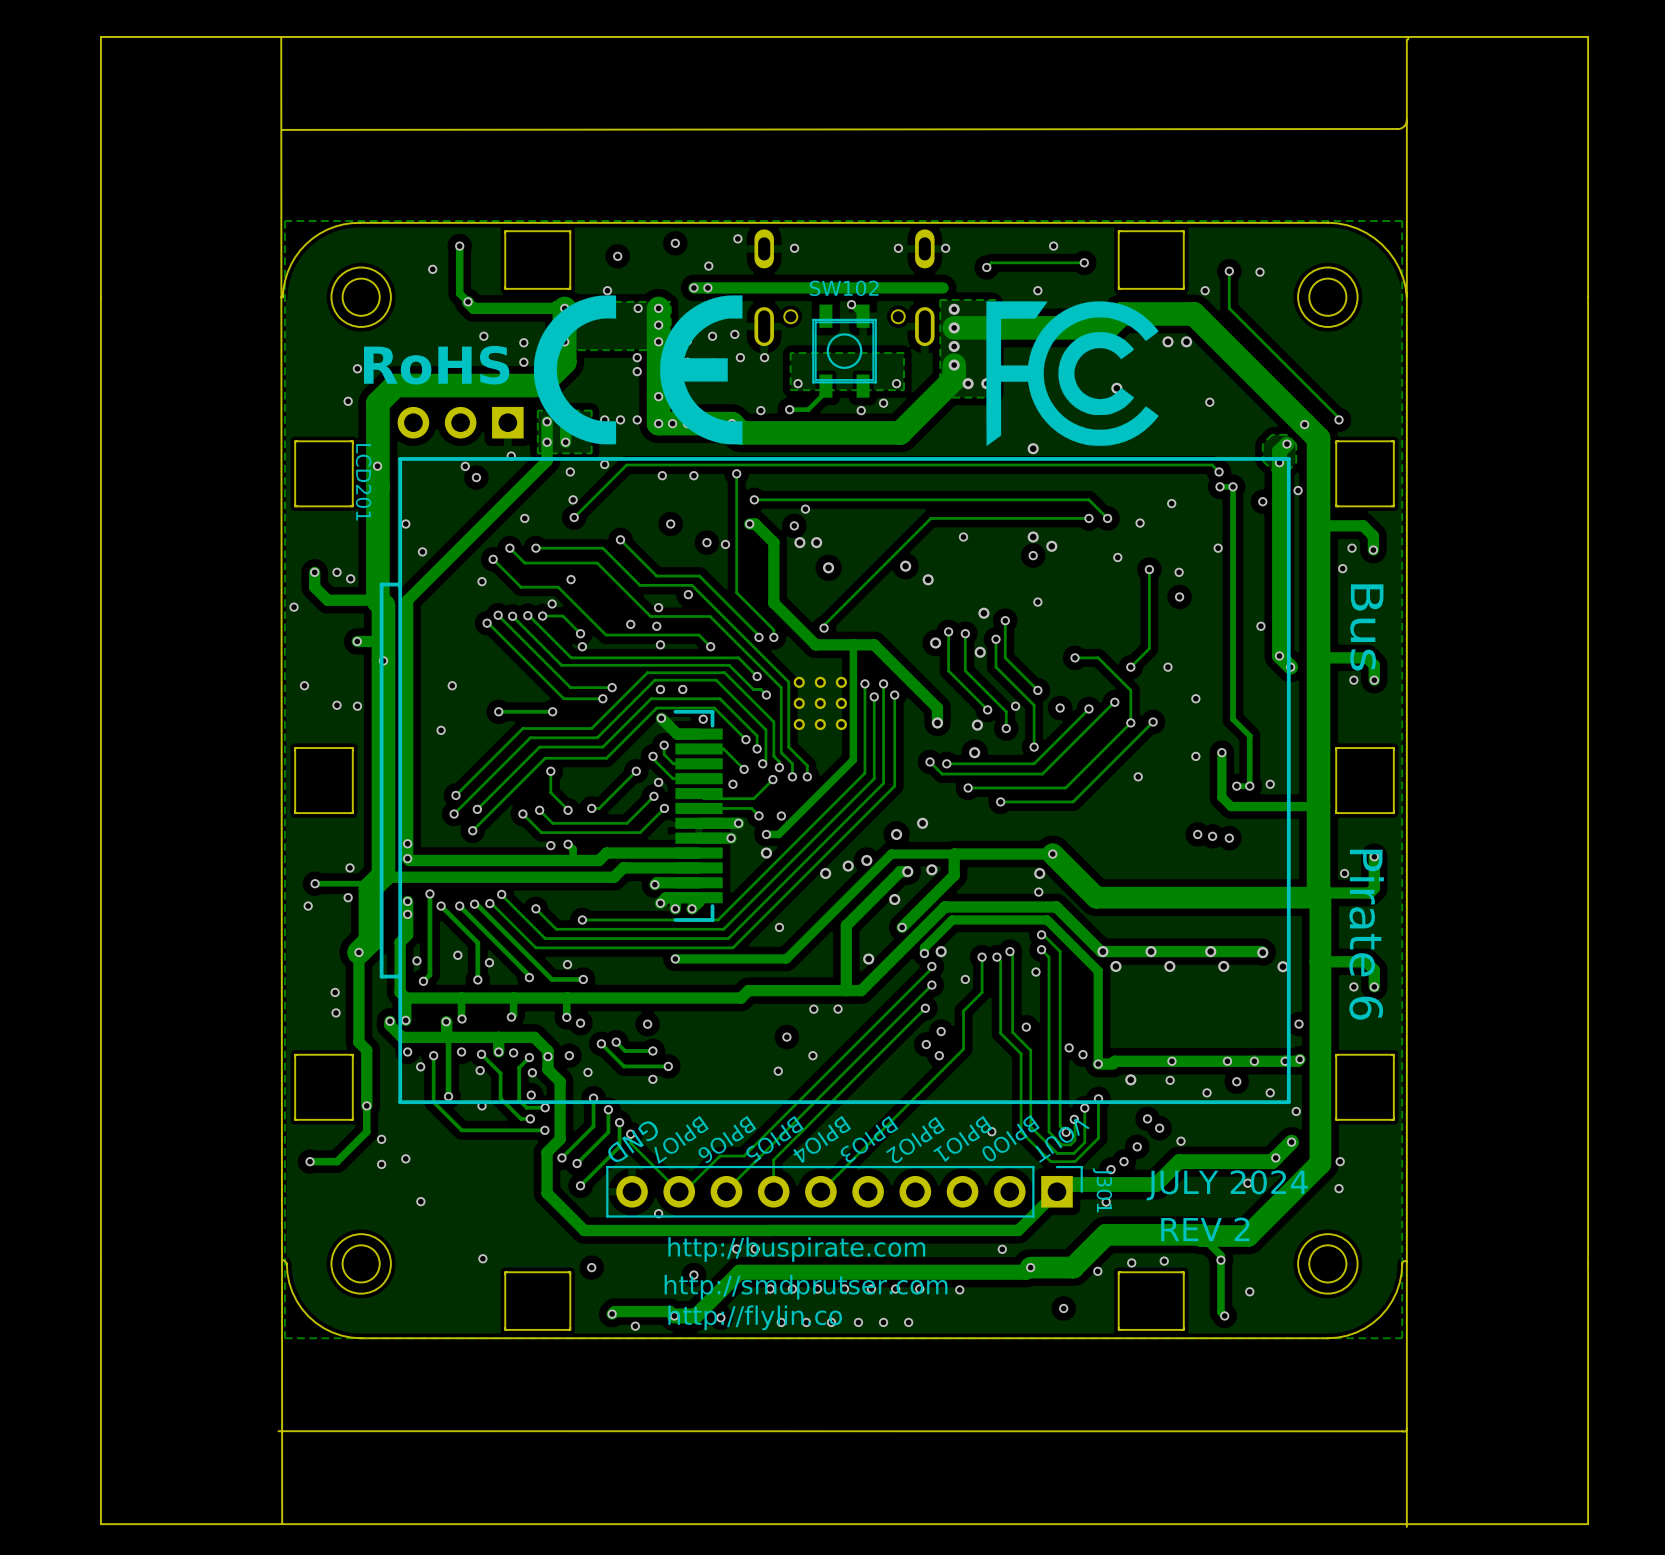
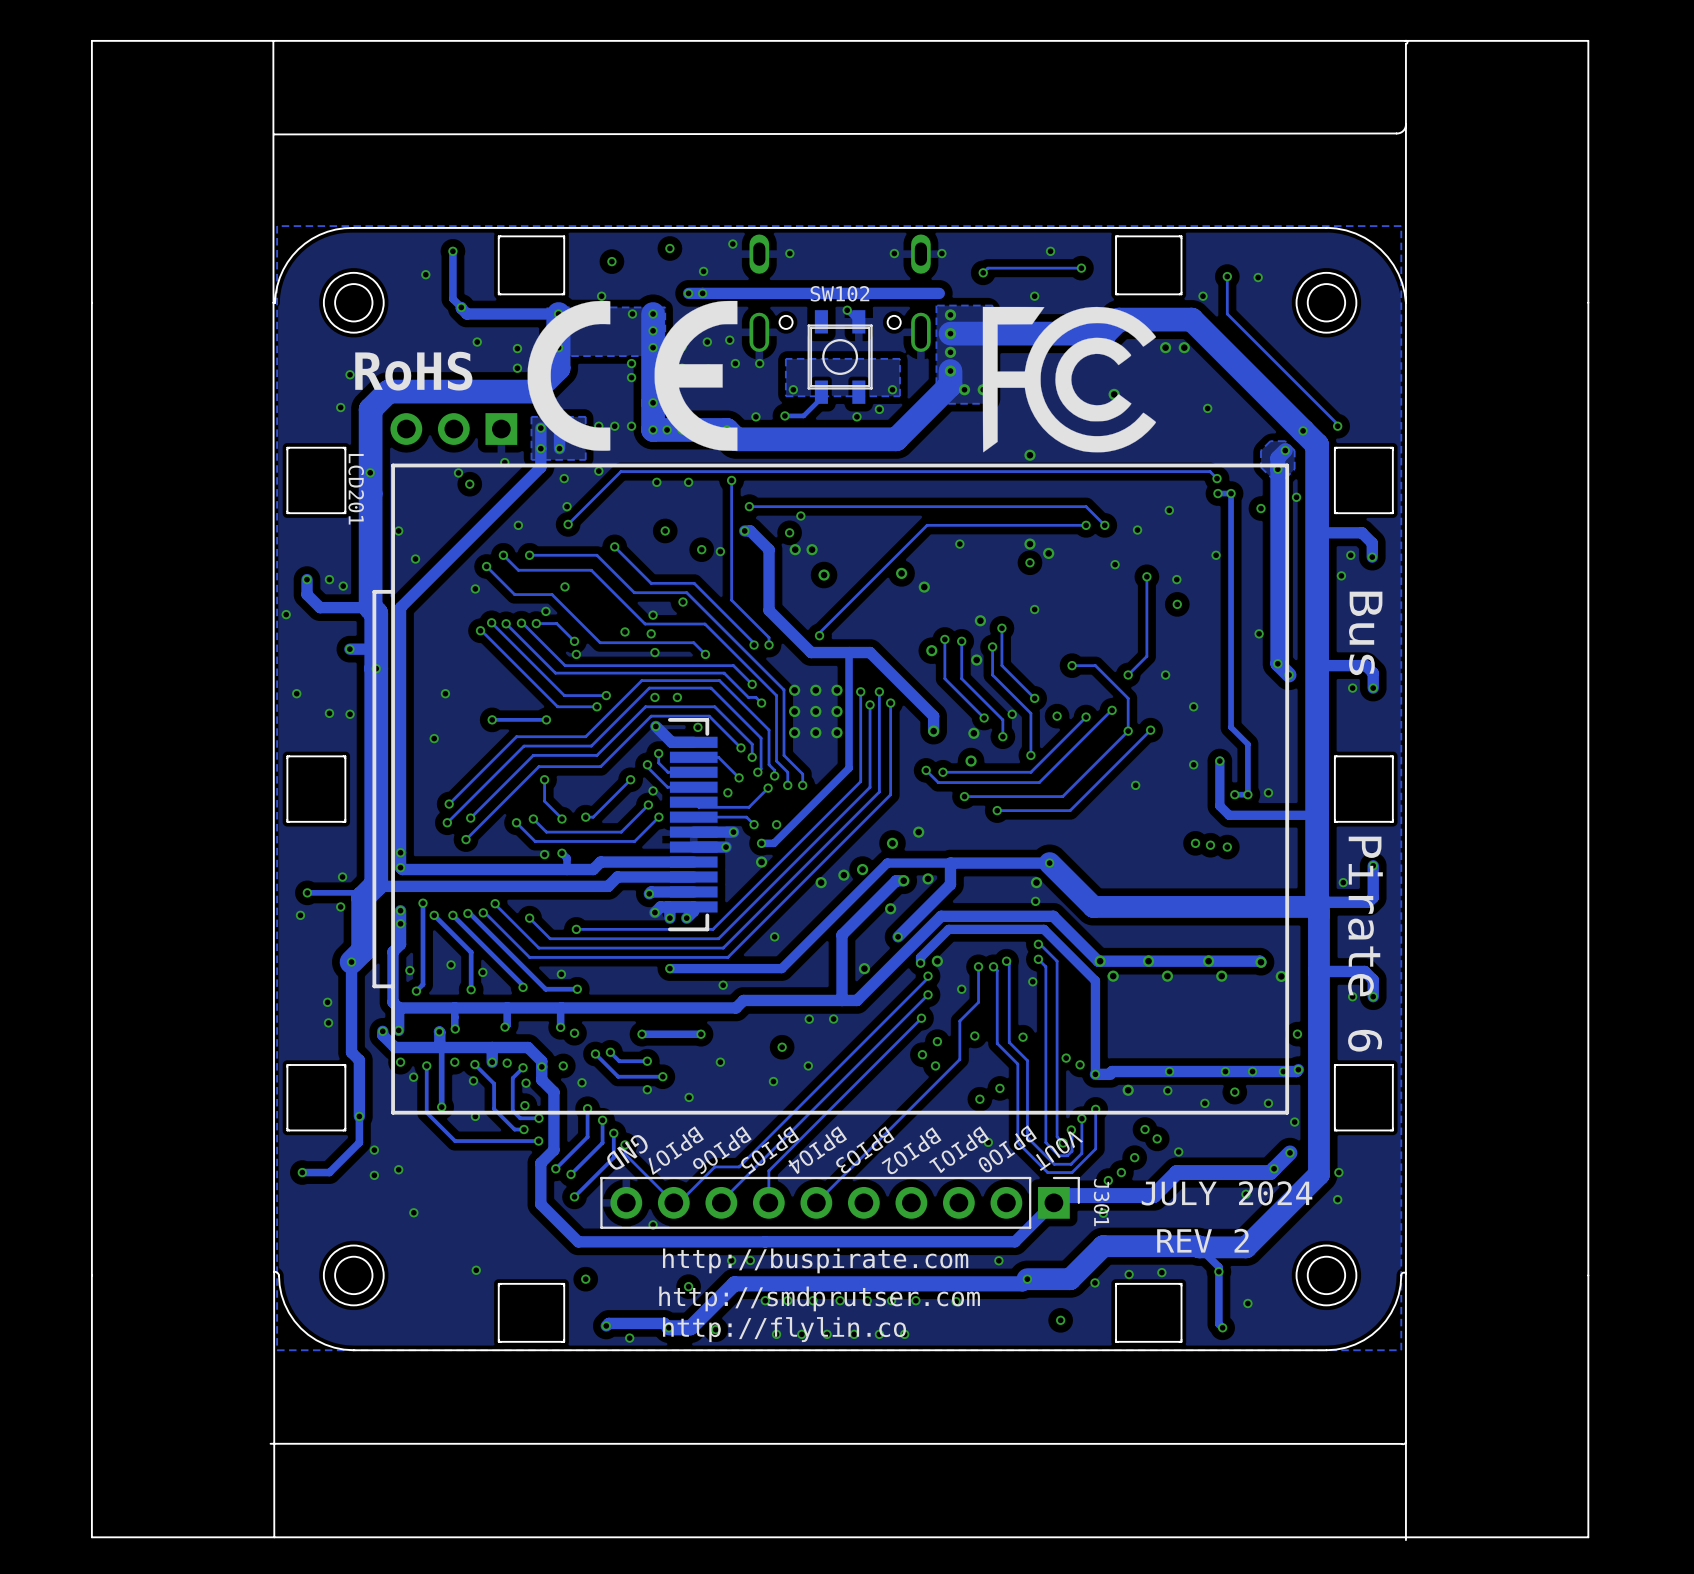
via: none -> (723, 985)
track: none -> (701, 1034) (642, 1034)
via: none -> (701, 1034)
via: none -> (974, 1036)
via: none -> (720, 1062)
via: none -> (999, 1088)
via: none -> (689, 1097)
via: none -> (979, 1099)

